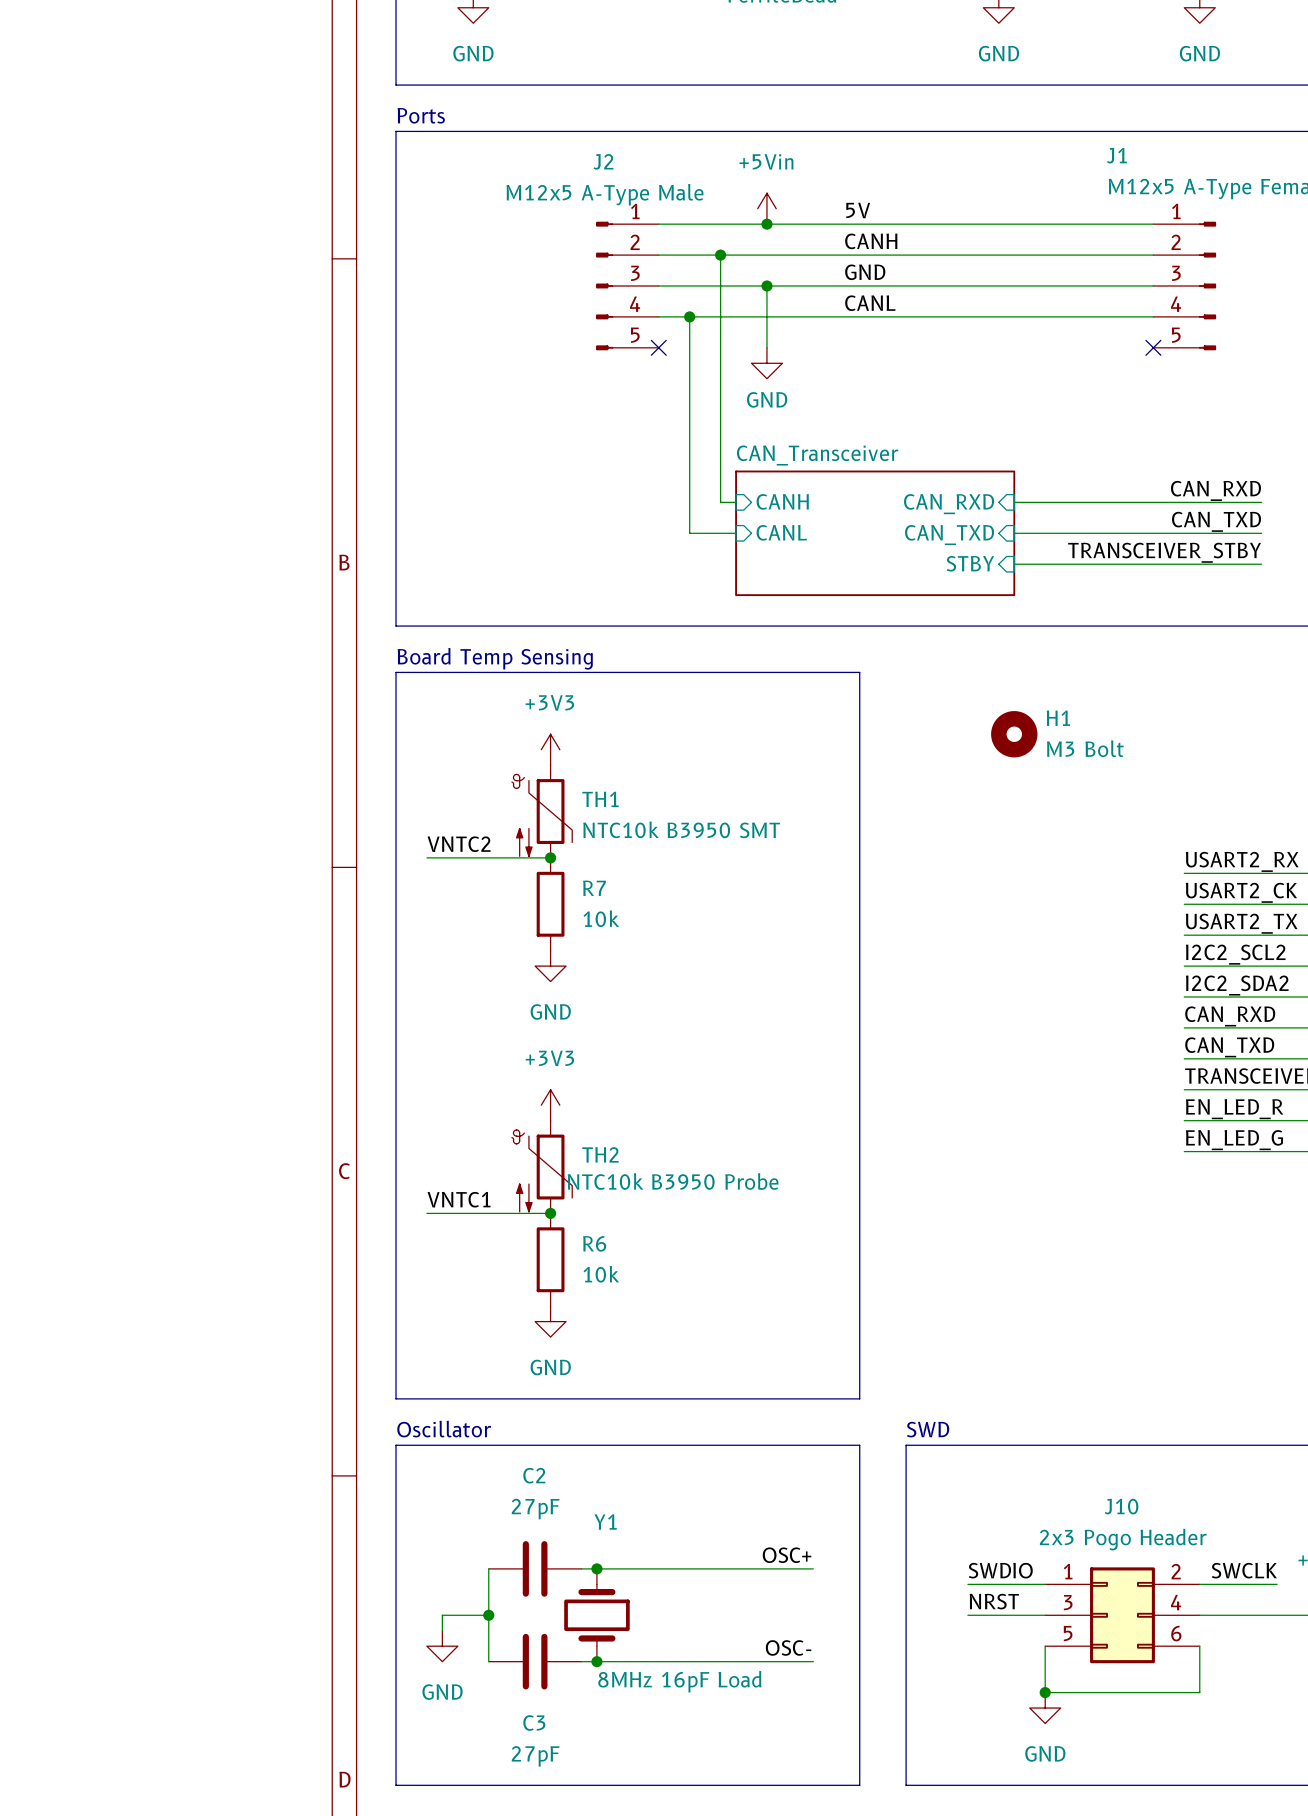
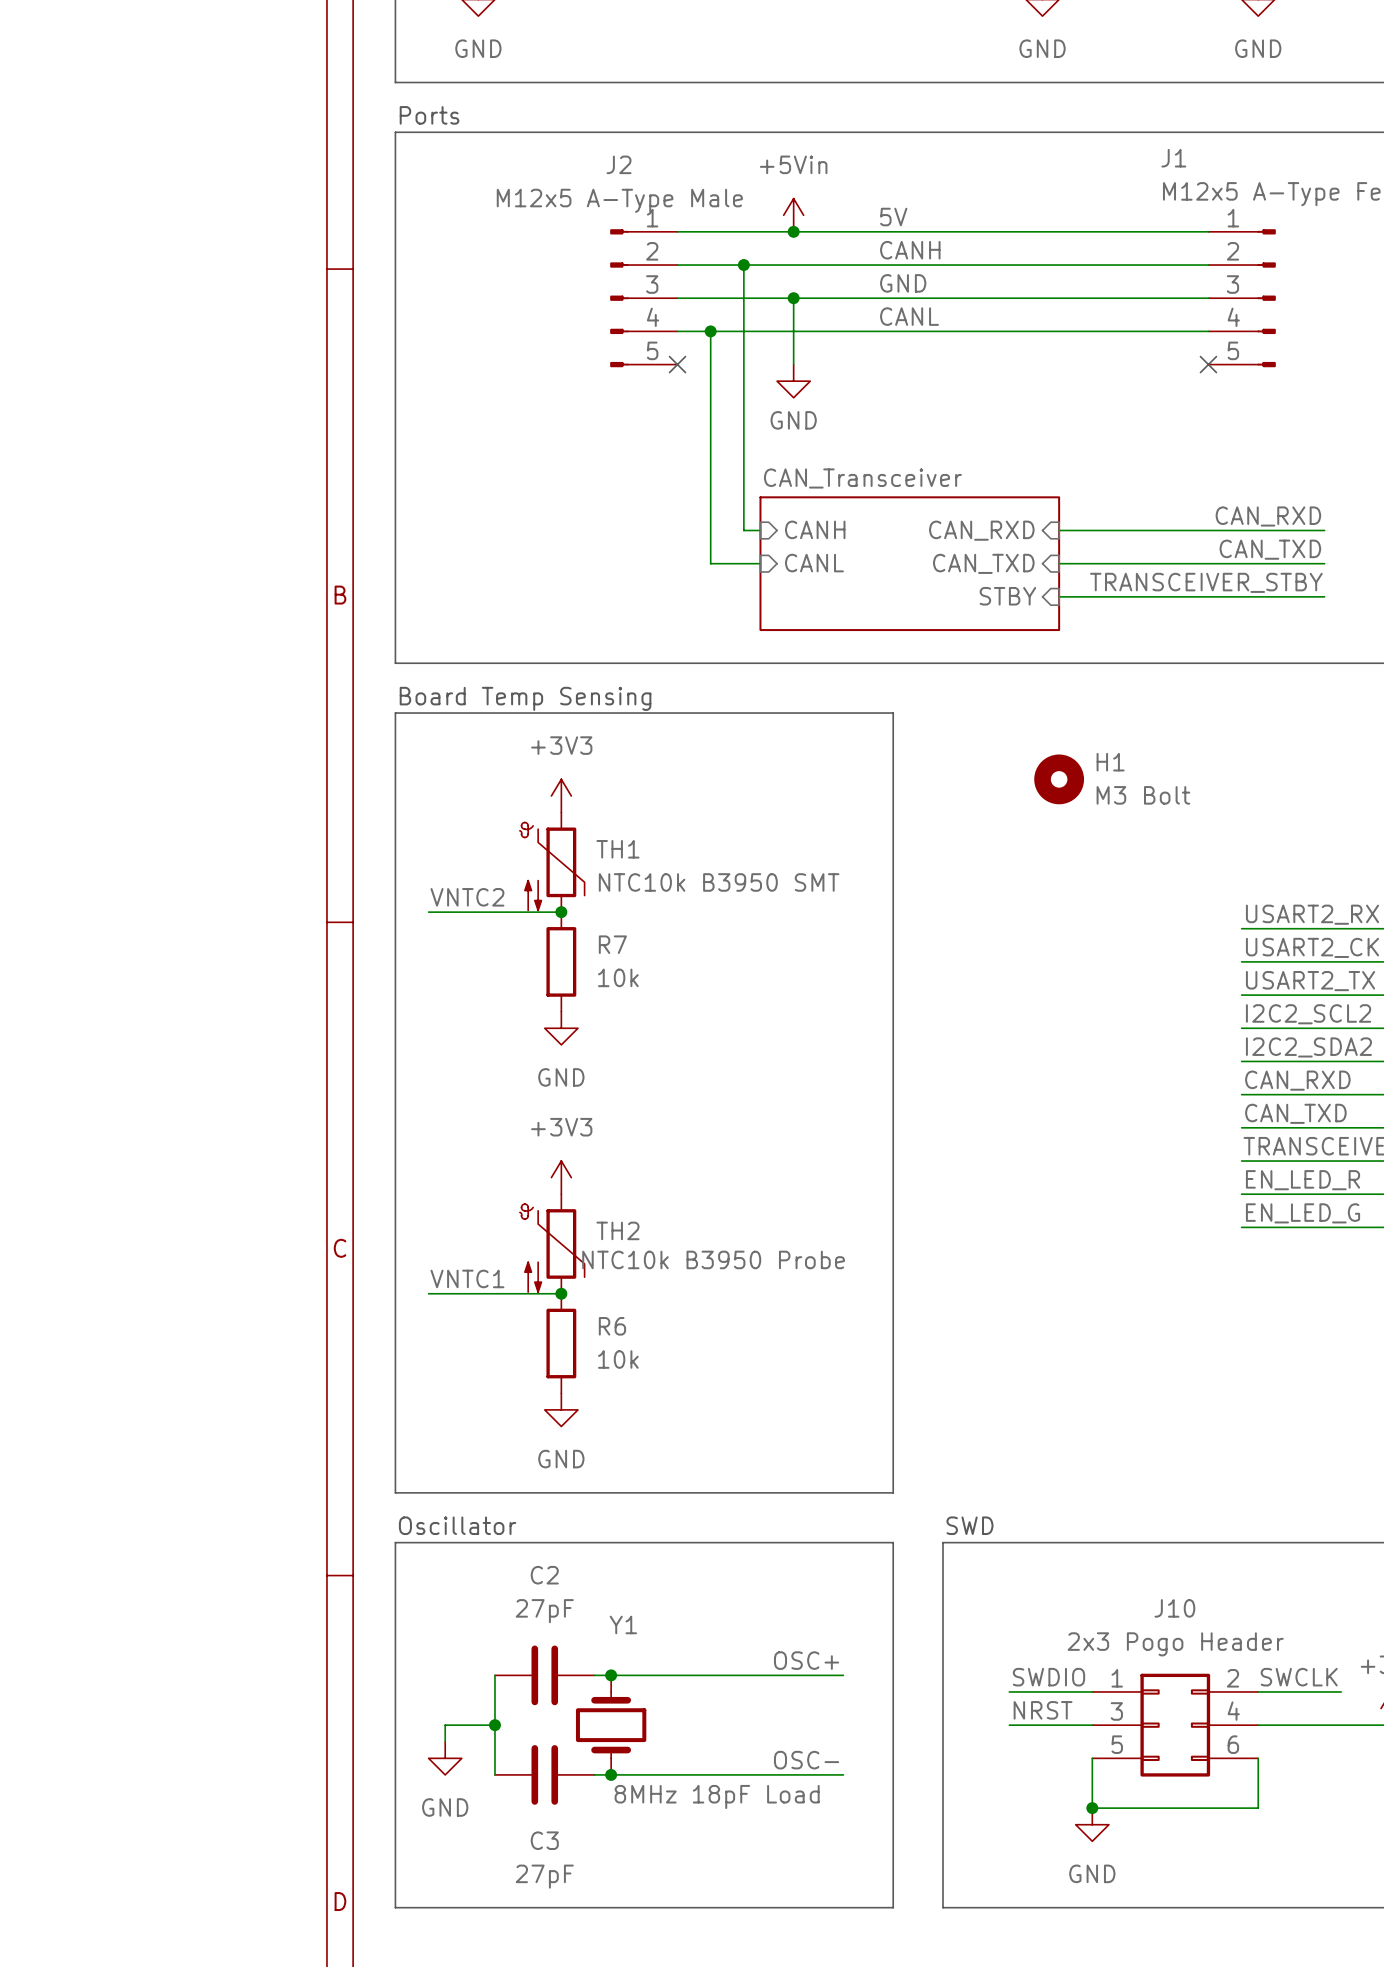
Y1 value: 8MHz 16pF Load (679, 1681) -> 8MHz 18pF Load (717, 1796)

